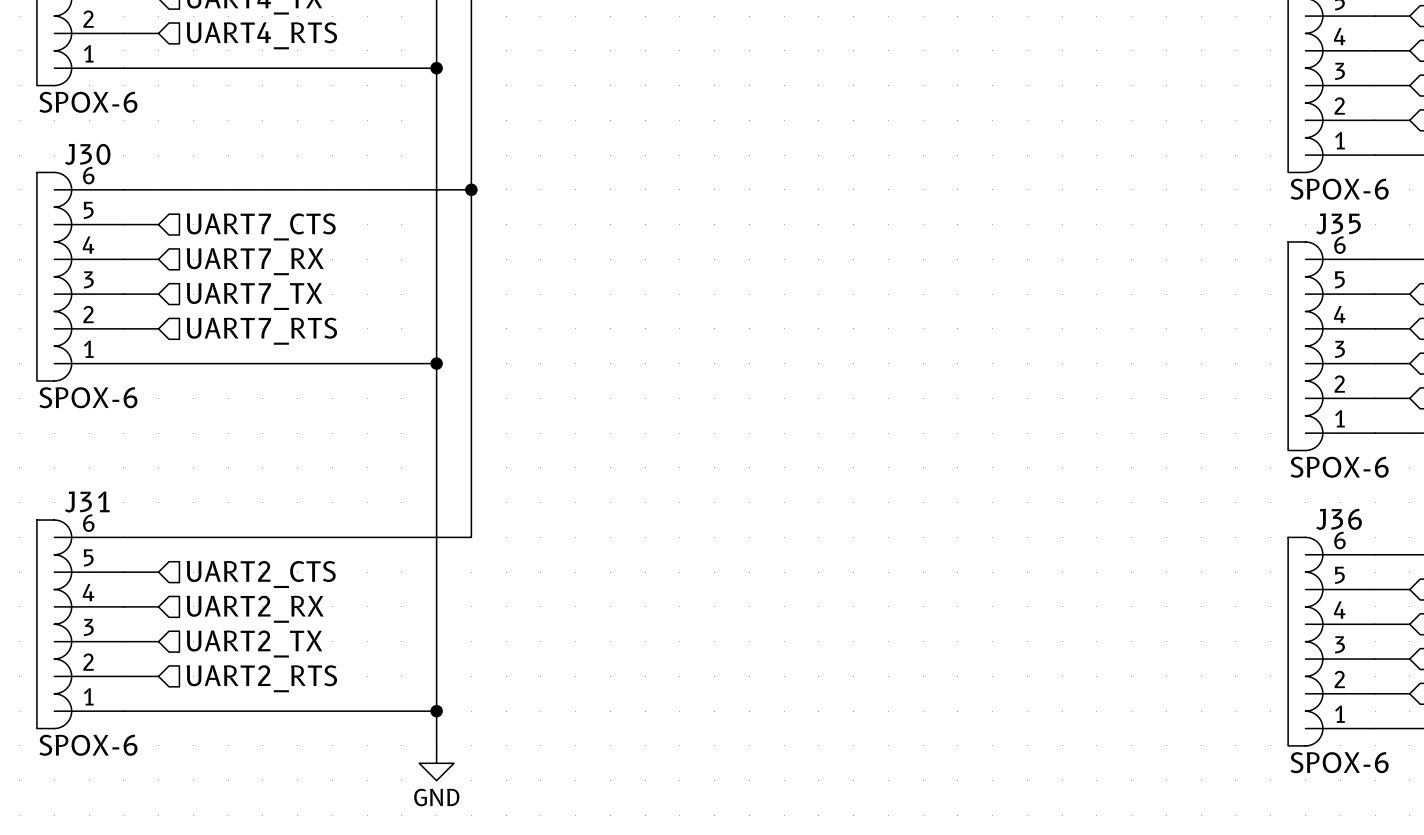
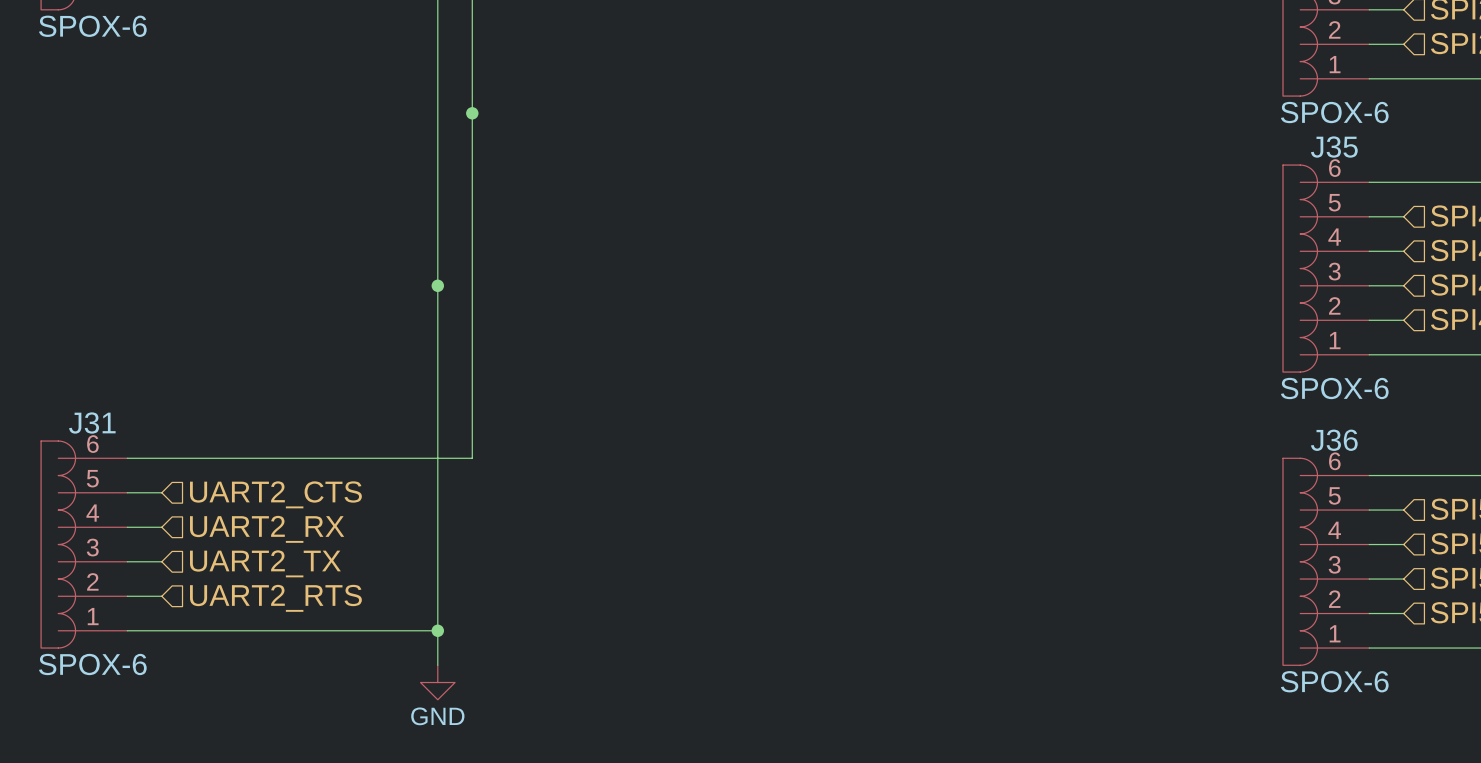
wire: (123, 189) (471, 189) -> none
wire: (123, 224) (158, 224) -> none
hierarchical label: UART7_CTS (261, 226) -> none
wire: (123, 259) (158, 259) -> none
hierarchical label: UART7_RX (255, 261) -> none
J30: SPOX-6 (80, 276) -> none
wire: (123, 294) (158, 294) -> none
hierarchical label: UART7_TX (254, 296) -> none
wire: (123, 328) (158, 328) -> none
hierarchical label: UART7_RTS (261, 331) -> none
wire: (123, 363) (436, 363) -> none

